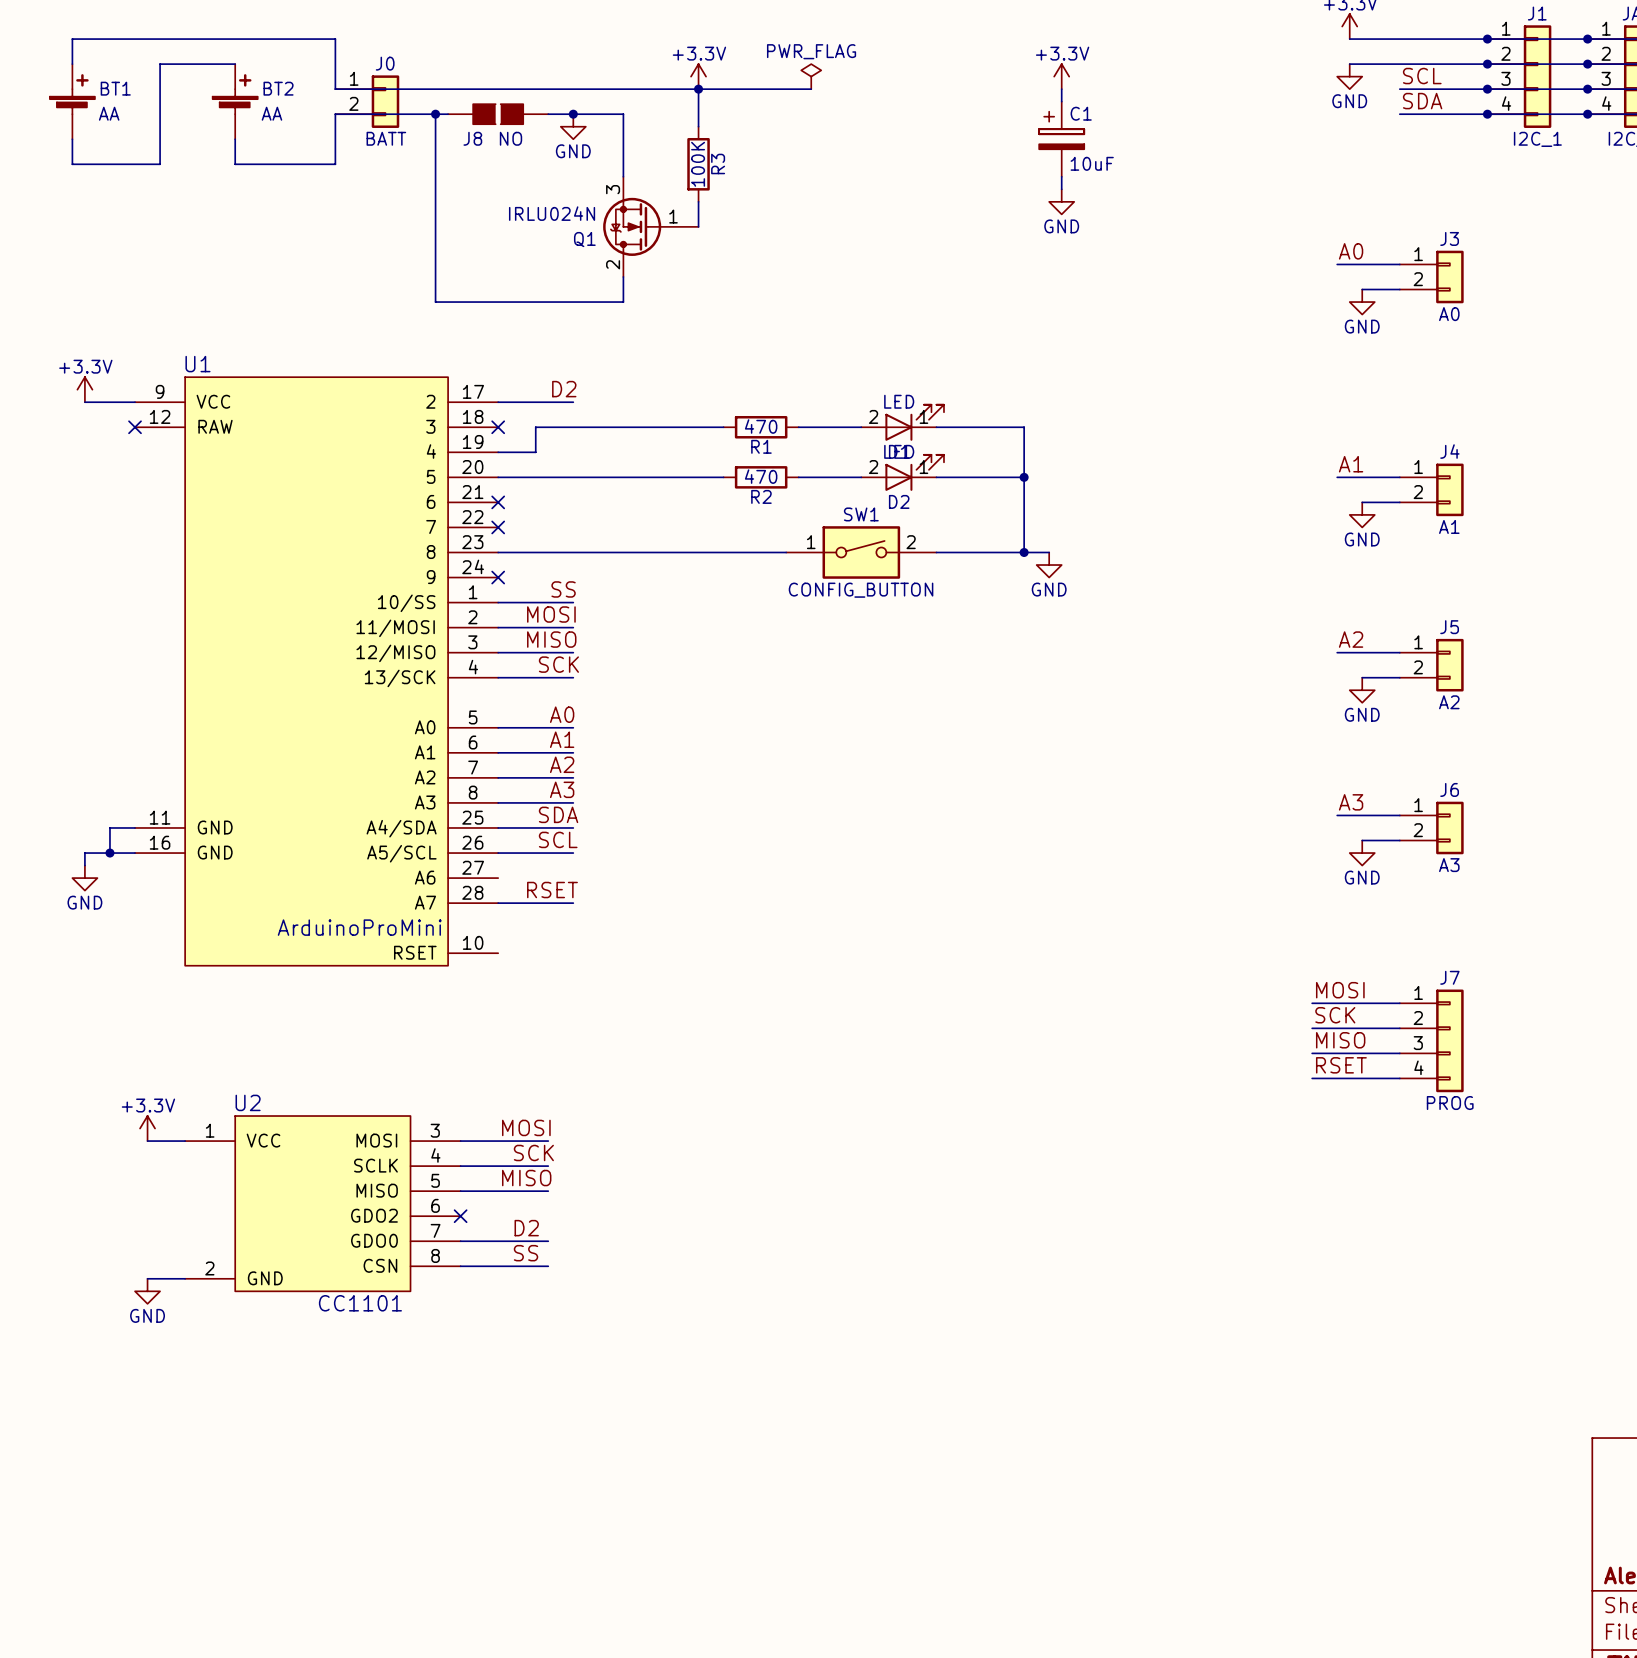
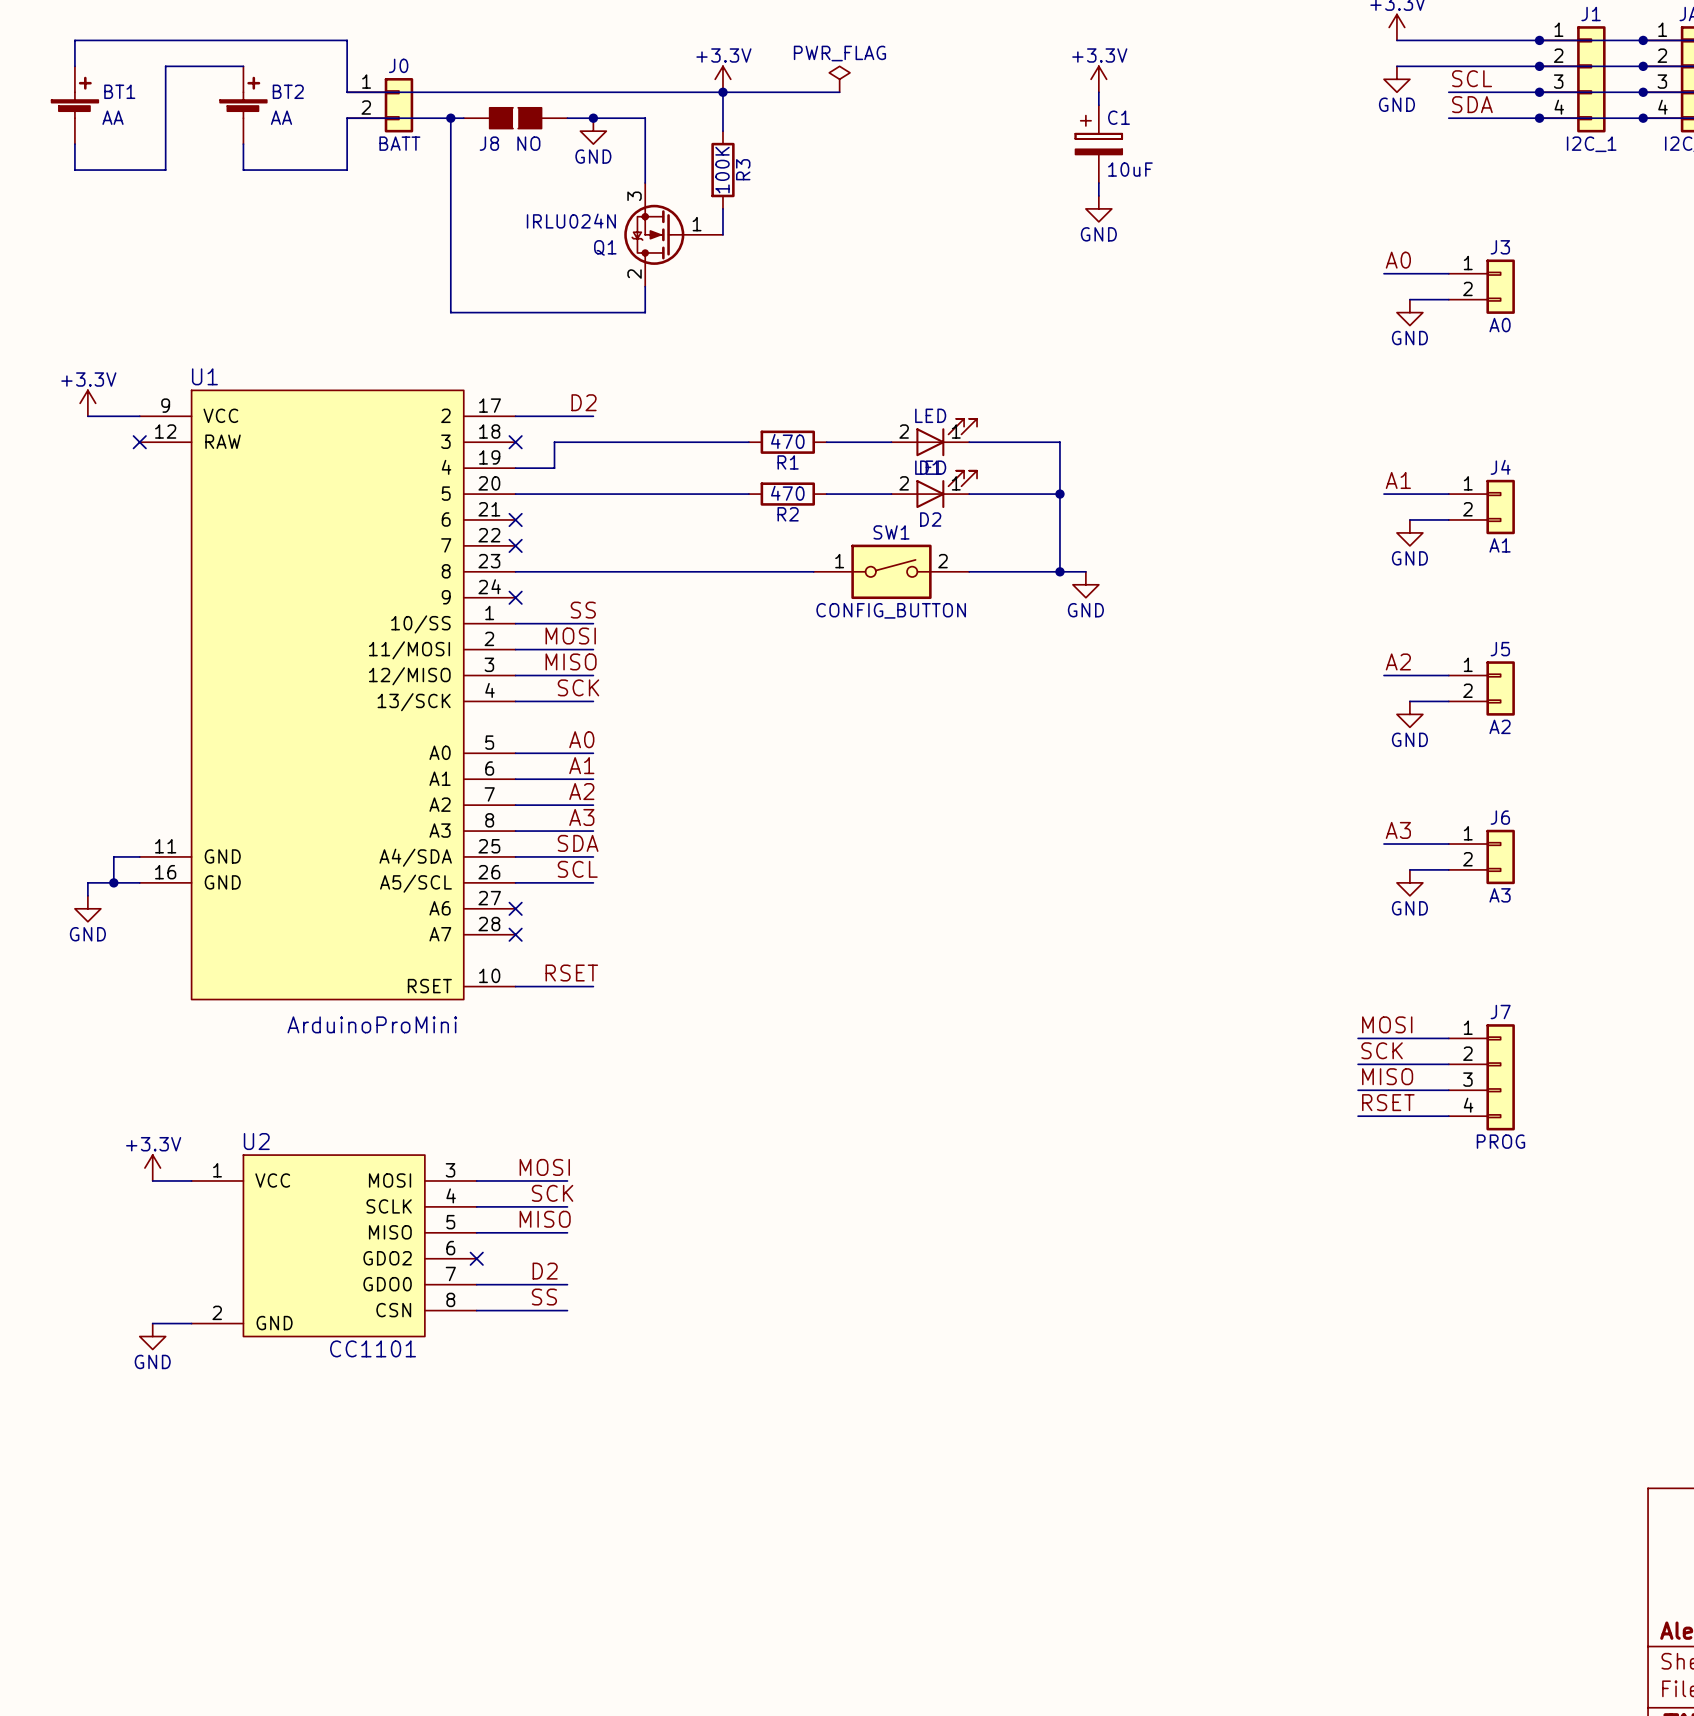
no-connect mark: none -> (515, 908)
label position: RSET (552, 890) -> RSET (571, 973)
wire: (498, 903) (573, 903) -> (515, 986) (593, 986)
no-connect mark: none -> (515, 934)
U1 value position: ArduinoProMini (359, 927) -> ArduinoProMini (372, 1024)

